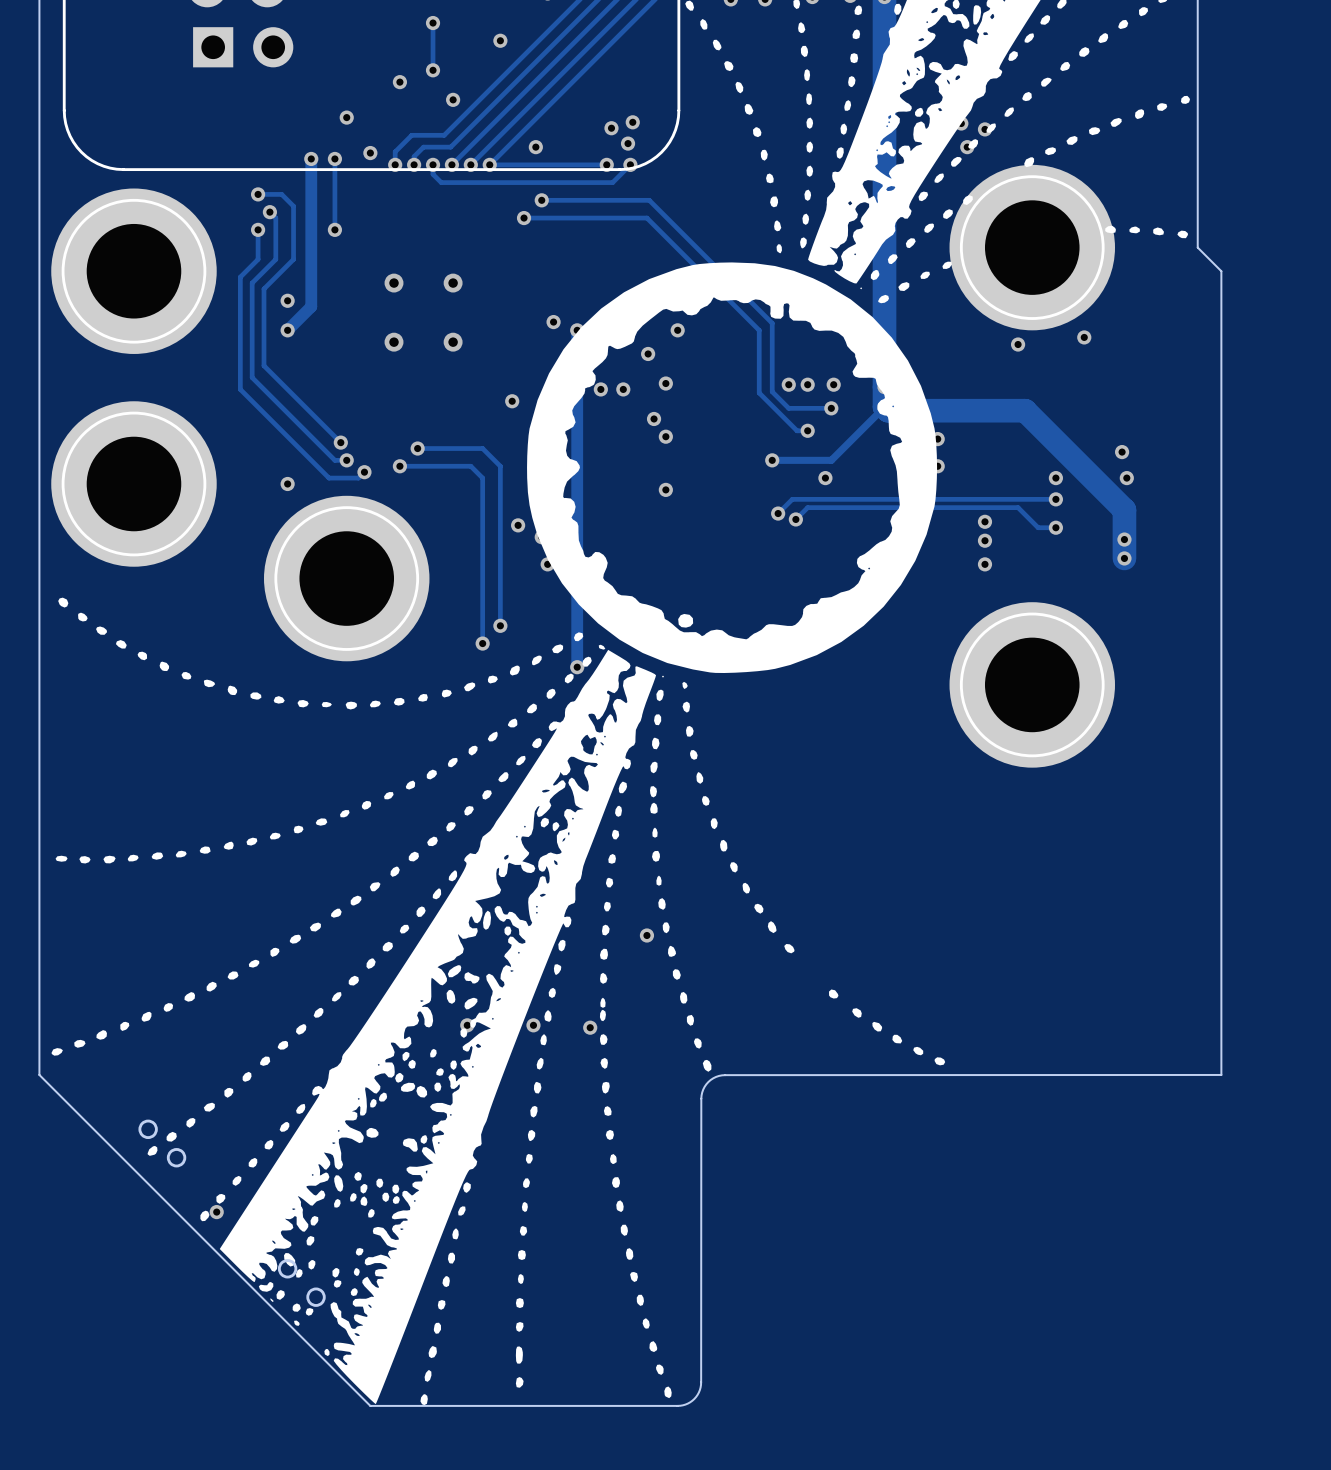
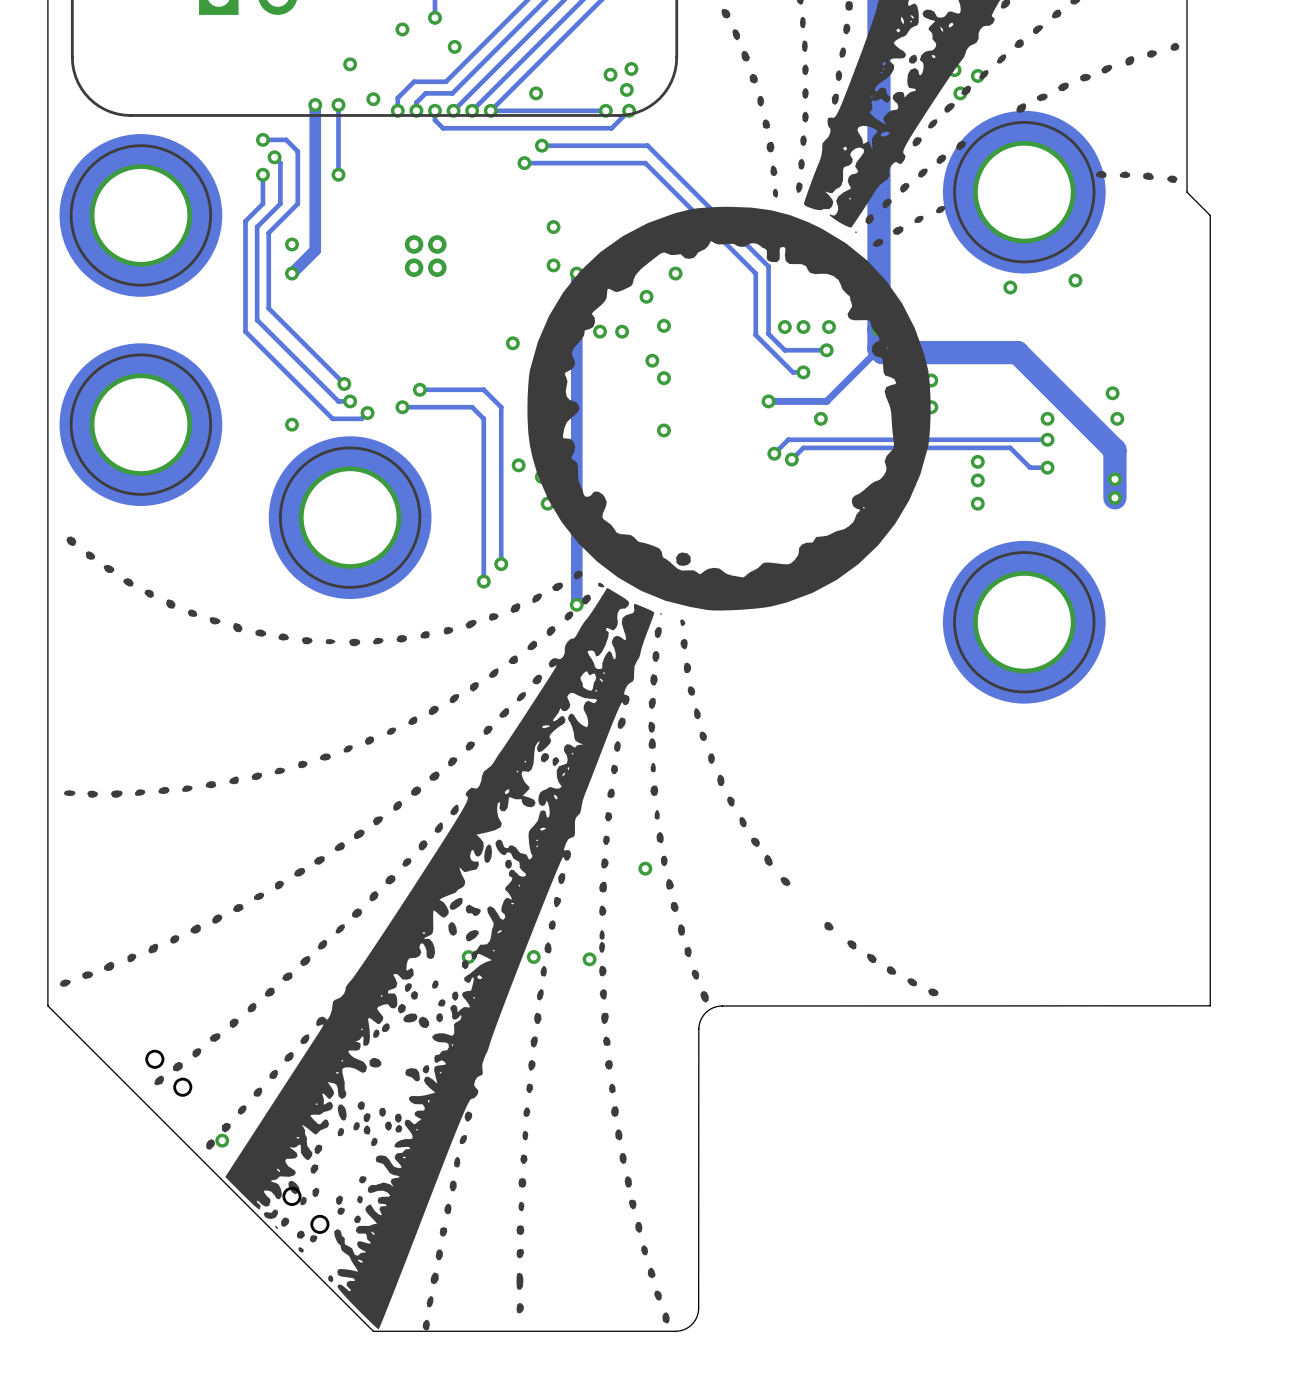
via: (394, 283) -> none
via: (453, 283) -> none
via: none -> (553, 227)
via: none -> (414, 244)
via: none -> (437, 244)
via: none -> (414, 267)
via: none -> (437, 267)
via: (394, 342) -> none
via: (453, 342) -> none

